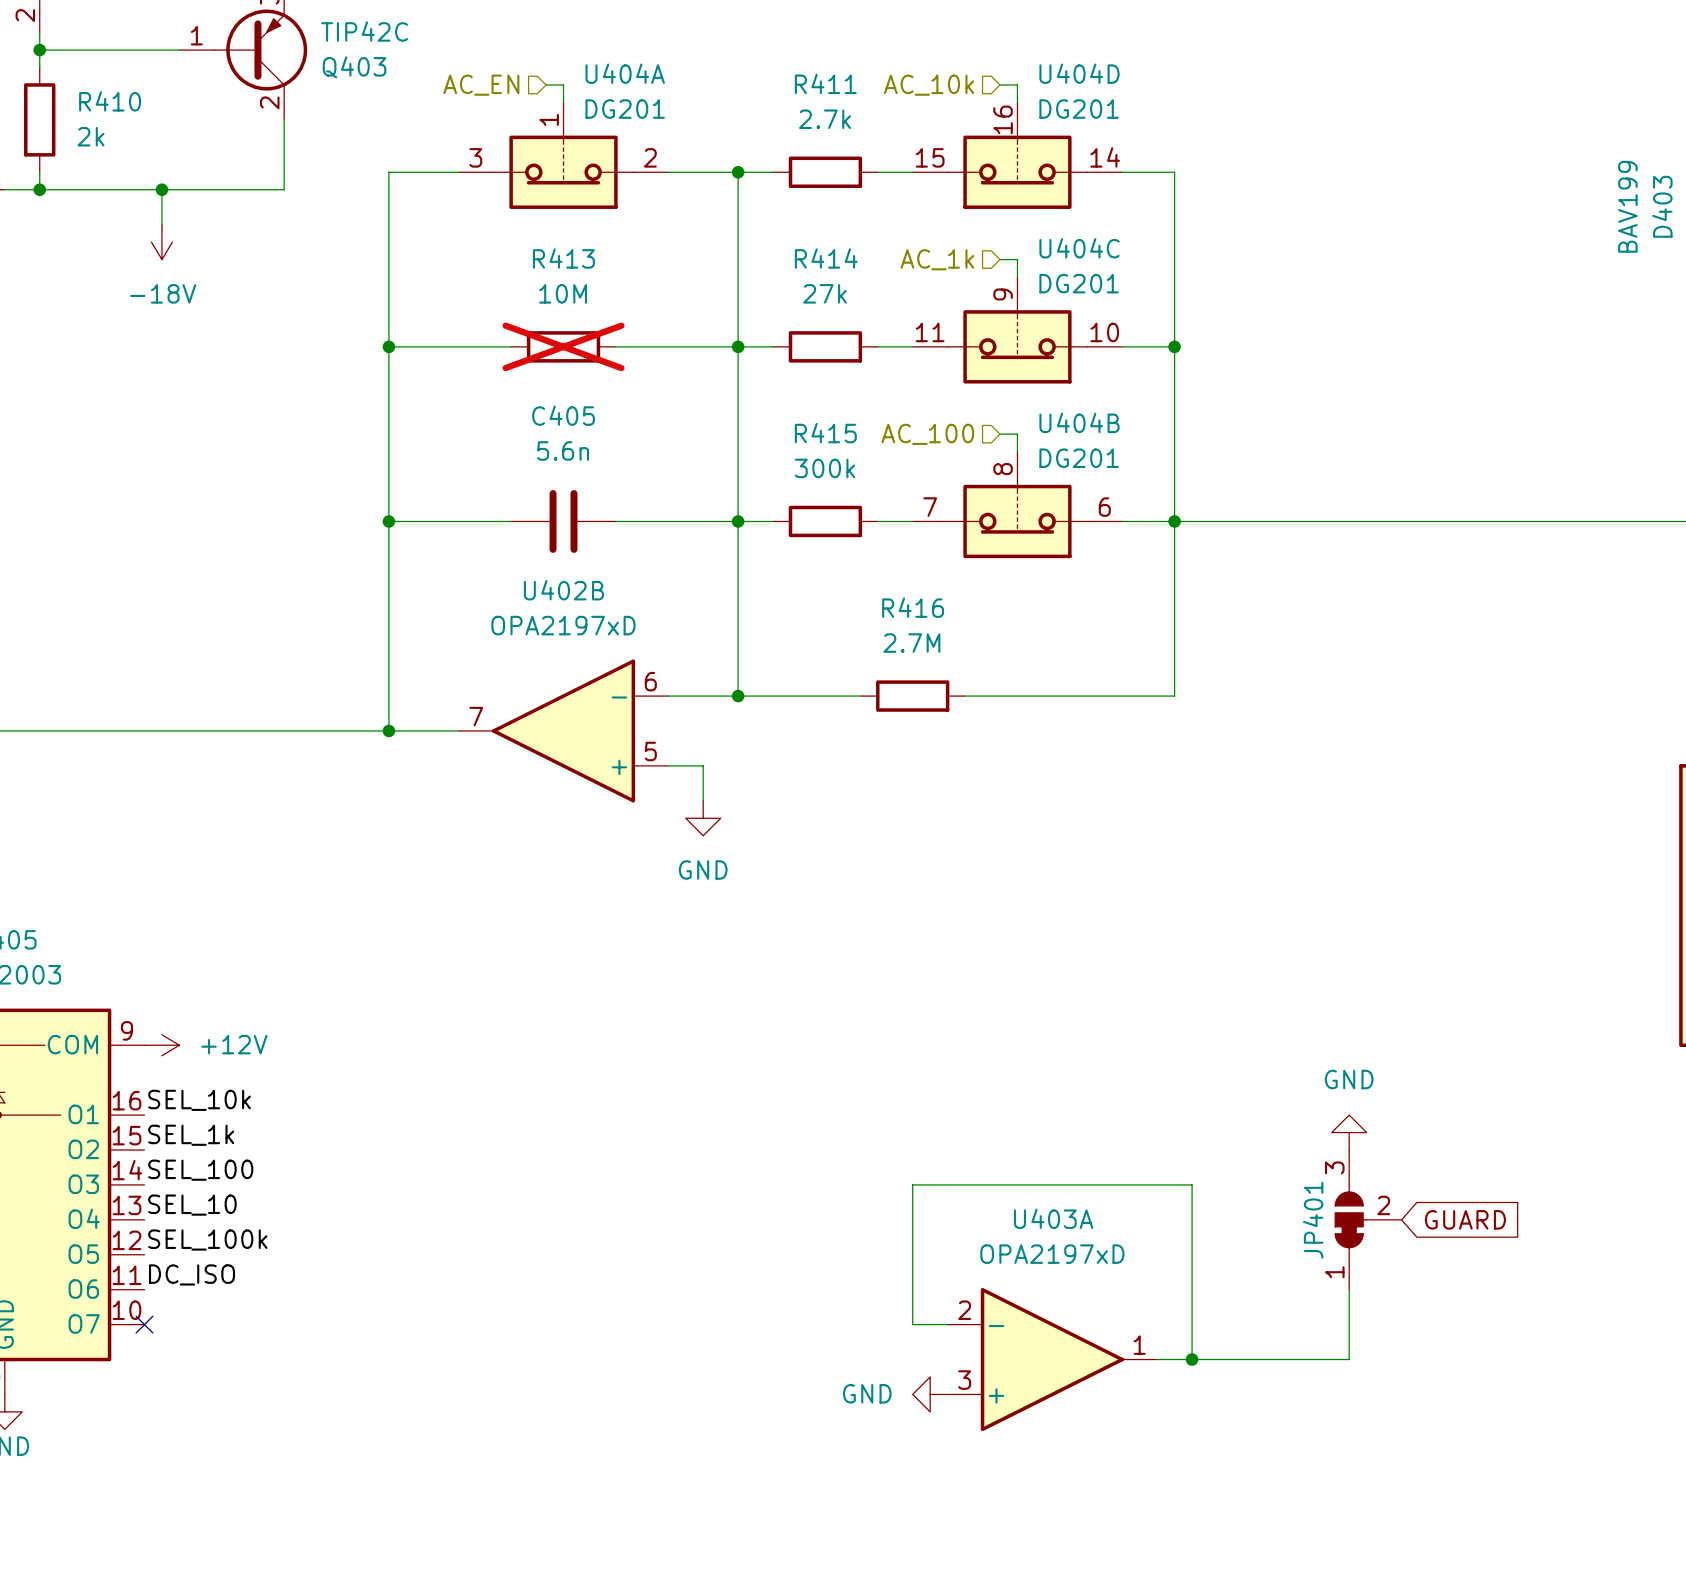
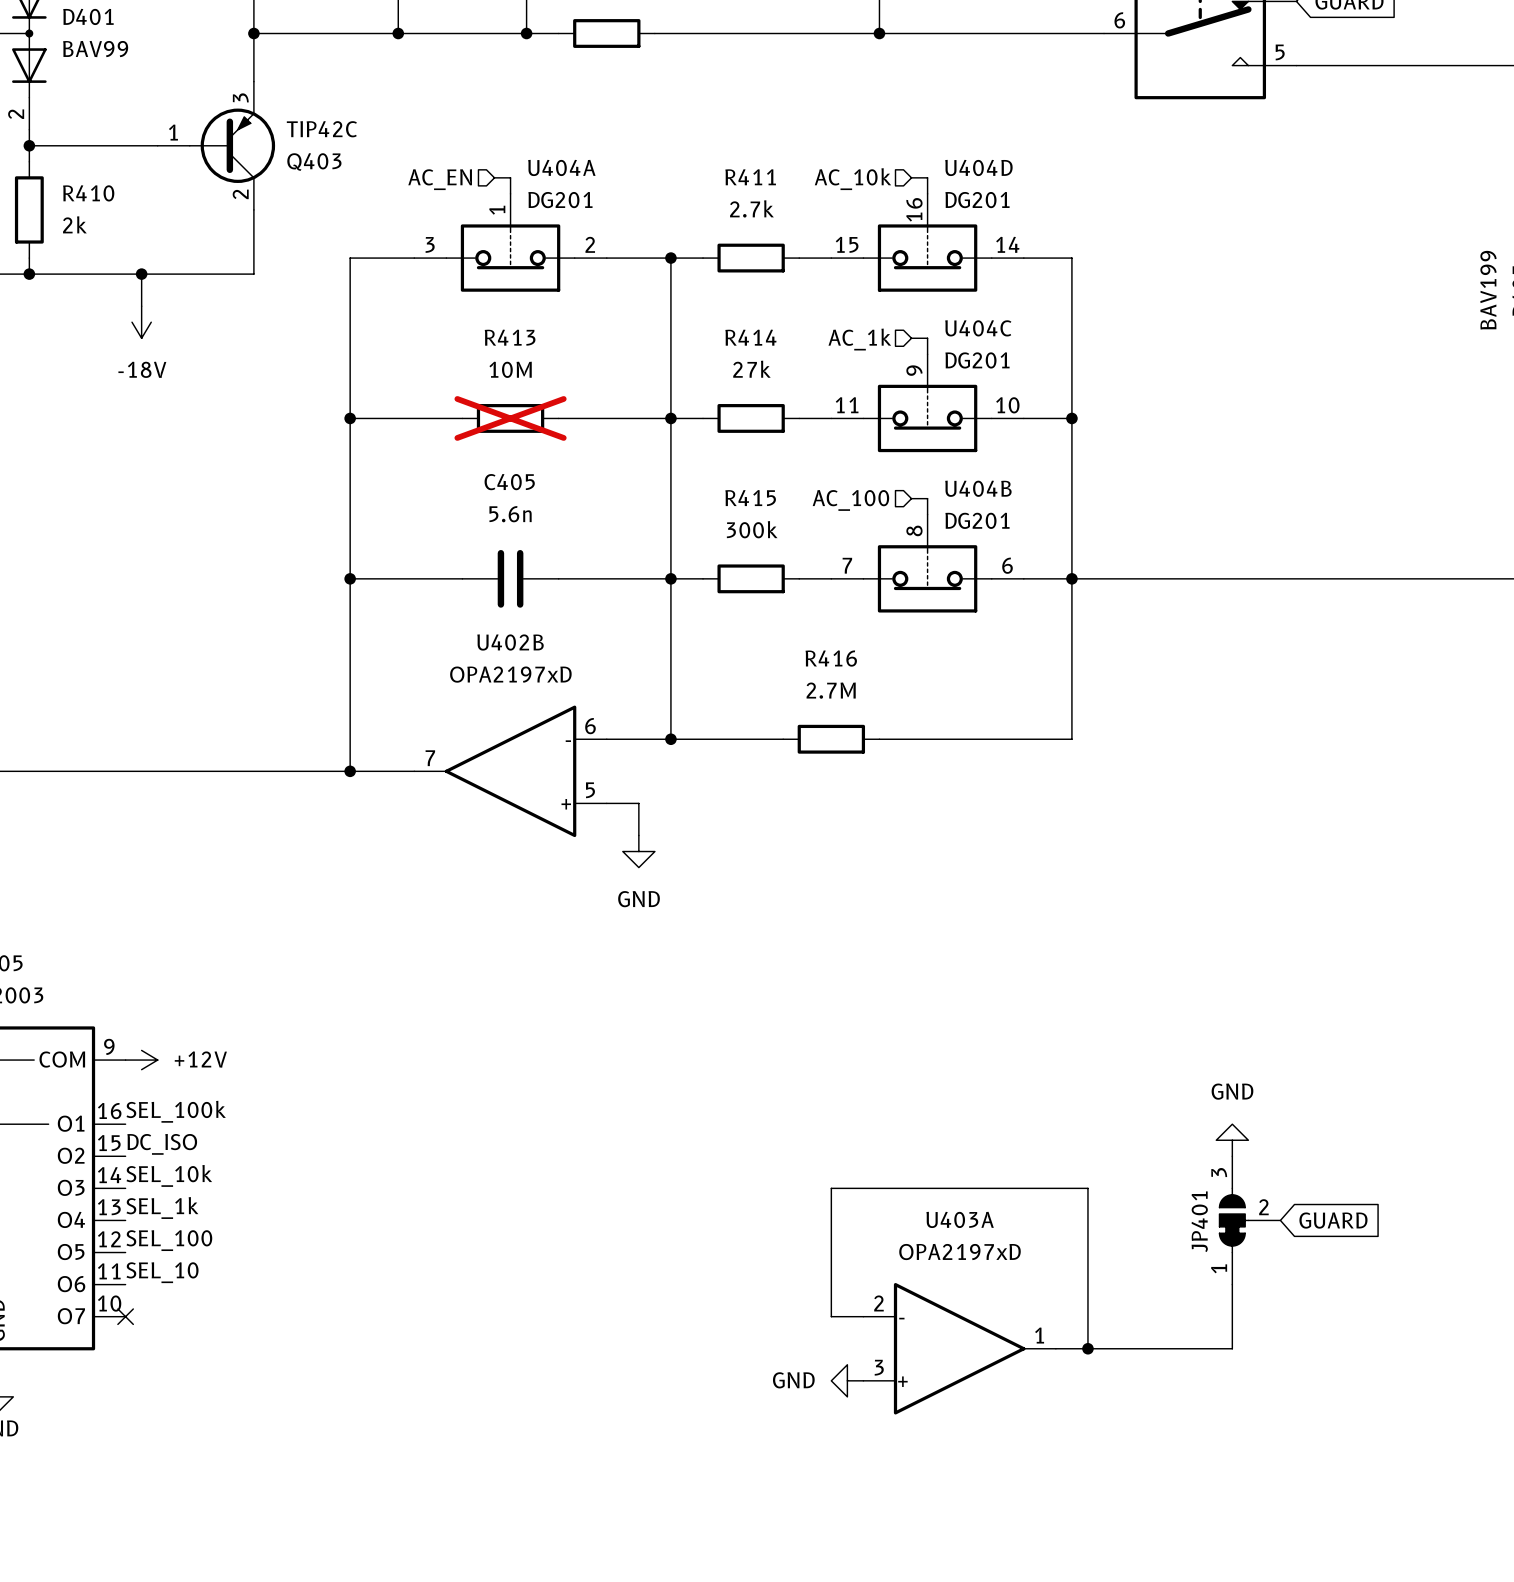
label: SEL_10k (199, 1100) -> SEL_100k (176, 1111)
label: SEL_1k (191, 1135) -> DC_ISO (162, 1144)
label: SEL_100 (200, 1170) -> SEL_10k (169, 1175)
label: SEL_10 (192, 1205) -> SEL_1k (162, 1208)
label: SEL_100k (207, 1240) -> SEL_100 (169, 1240)
label: DC_ISO (192, 1274) -> SEL_10 (162, 1272)

